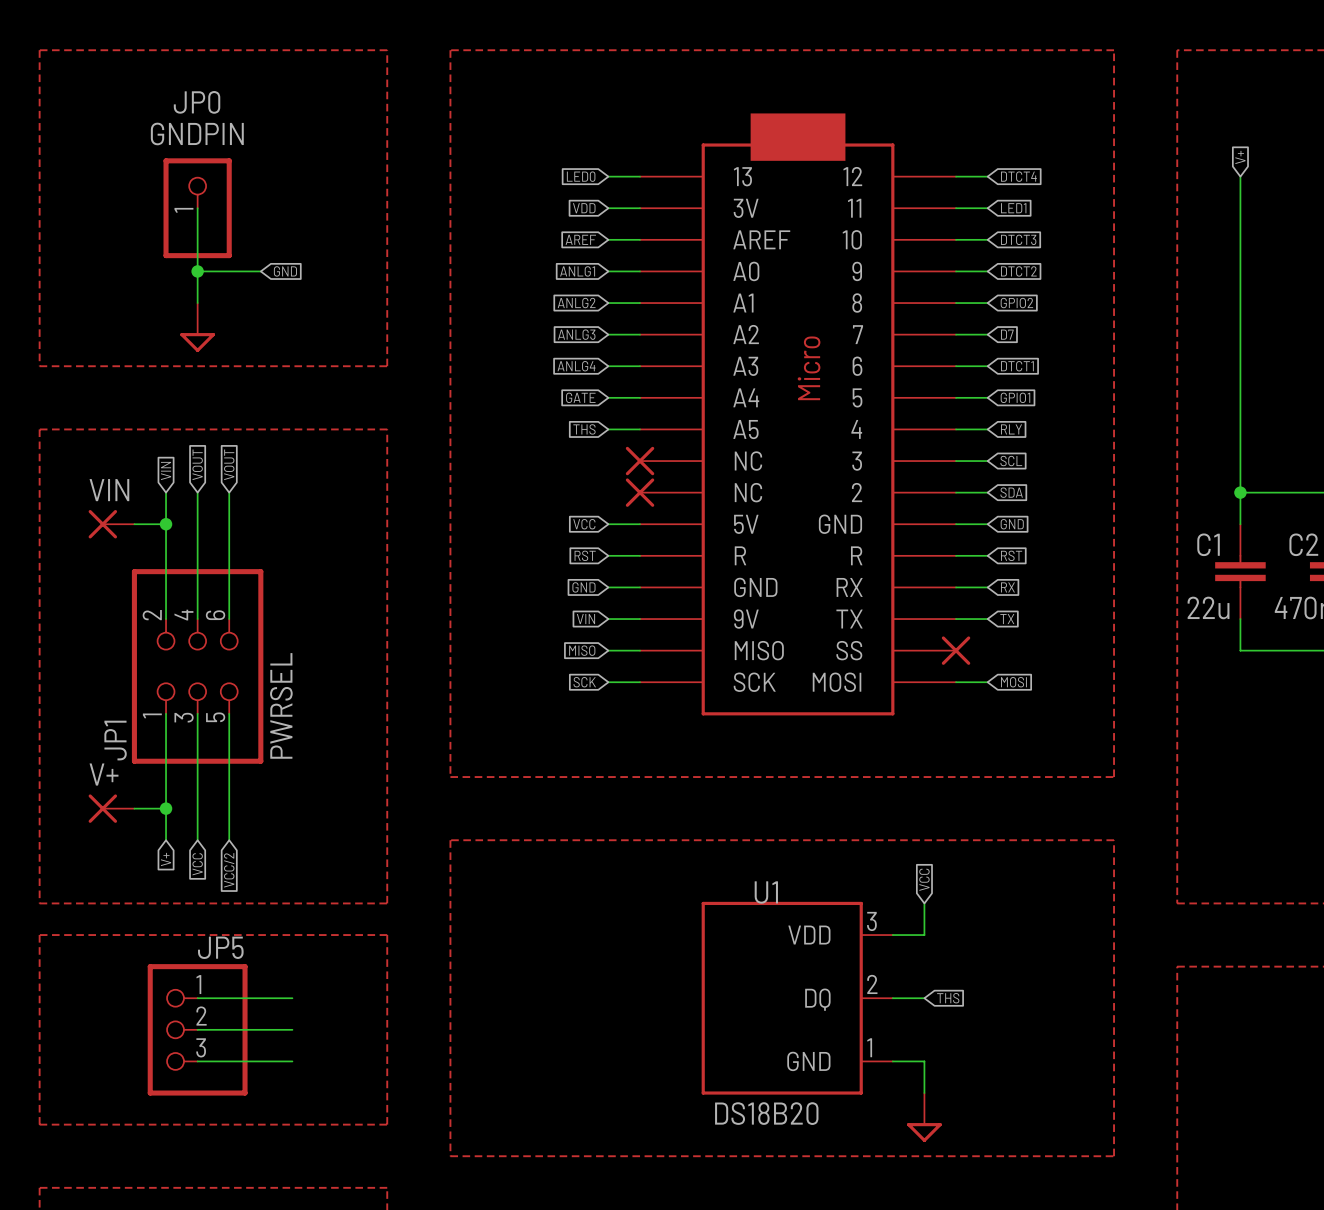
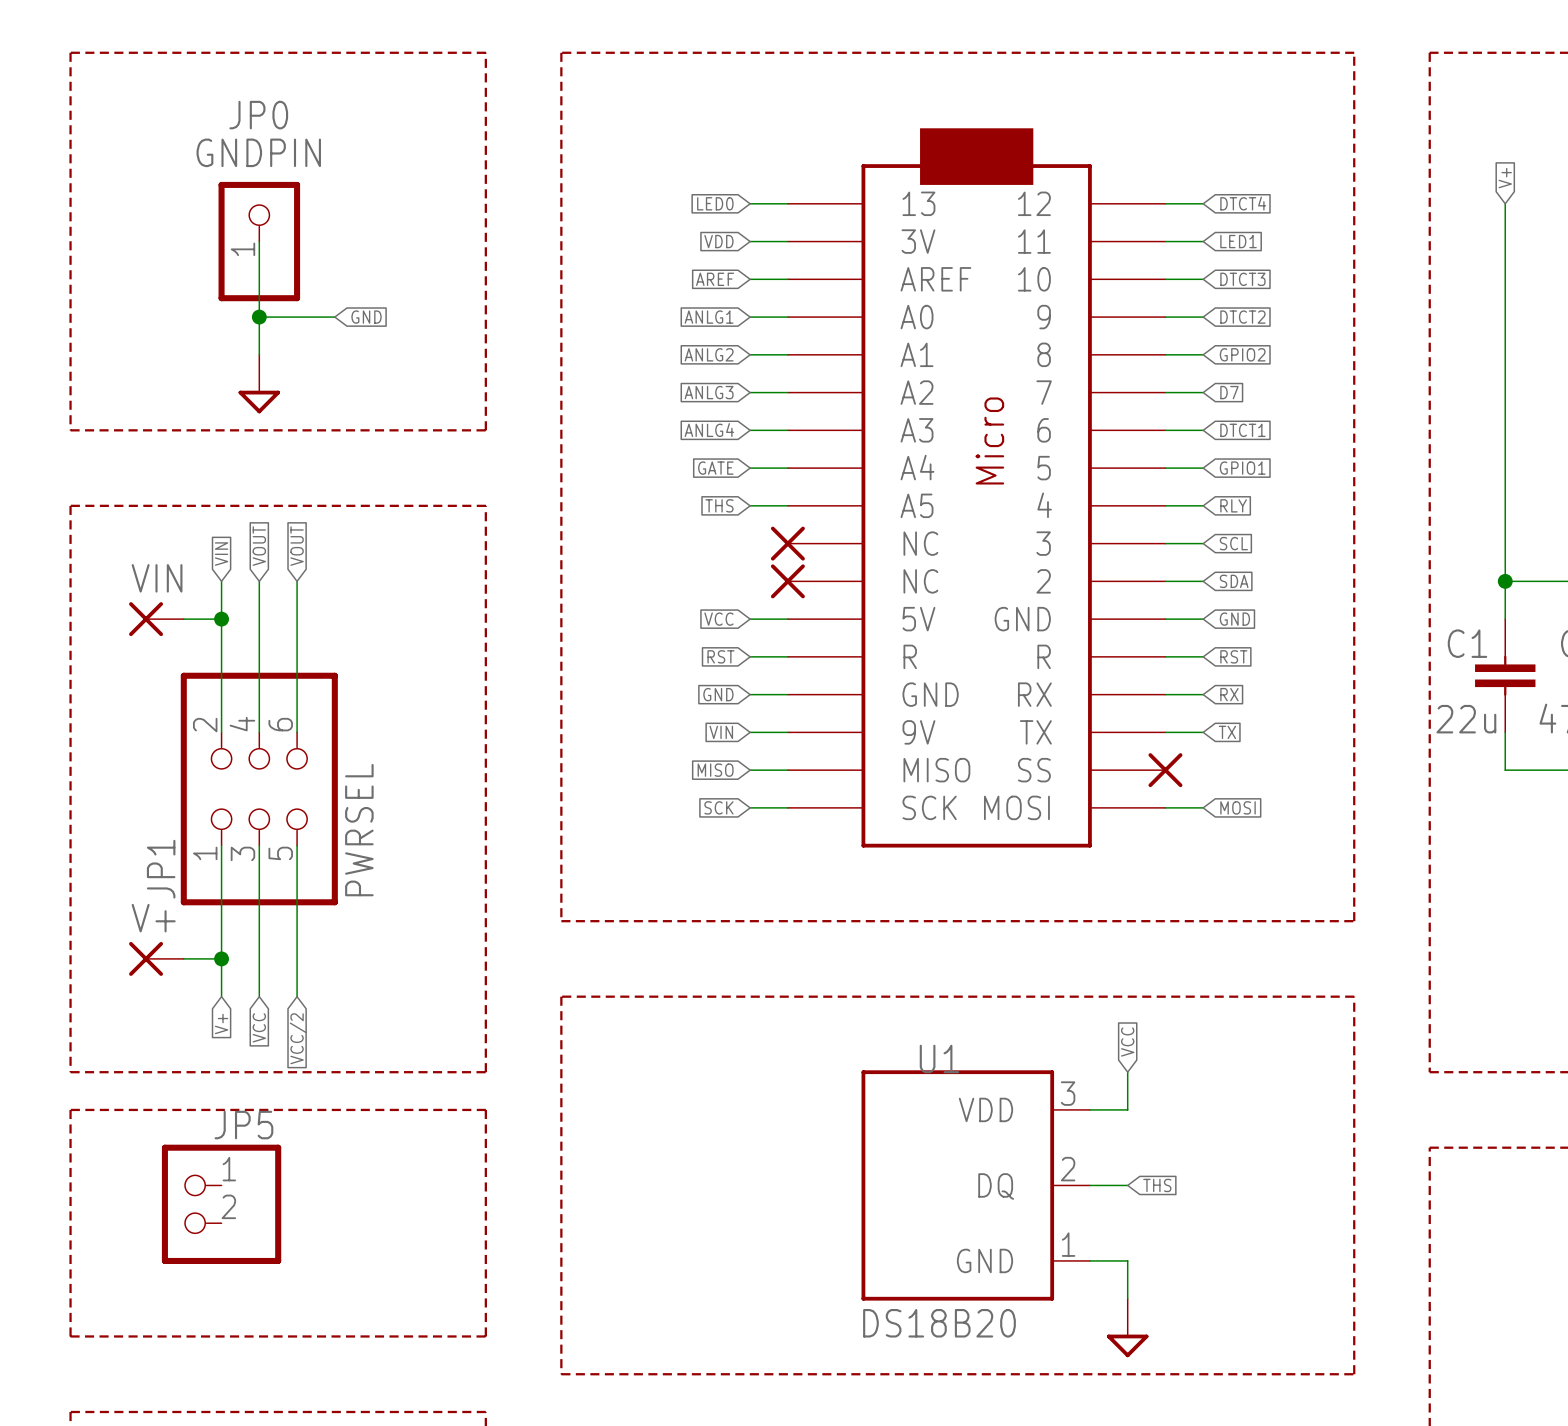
JP5 symbol: [147, 964, 248, 1096] -> [161, 1144, 282, 1264]
wire: (197, 998) (292, 998) -> none
wire: (197, 1029) (292, 1029) -> none
wire: (197, 1061) (292, 1061) -> none

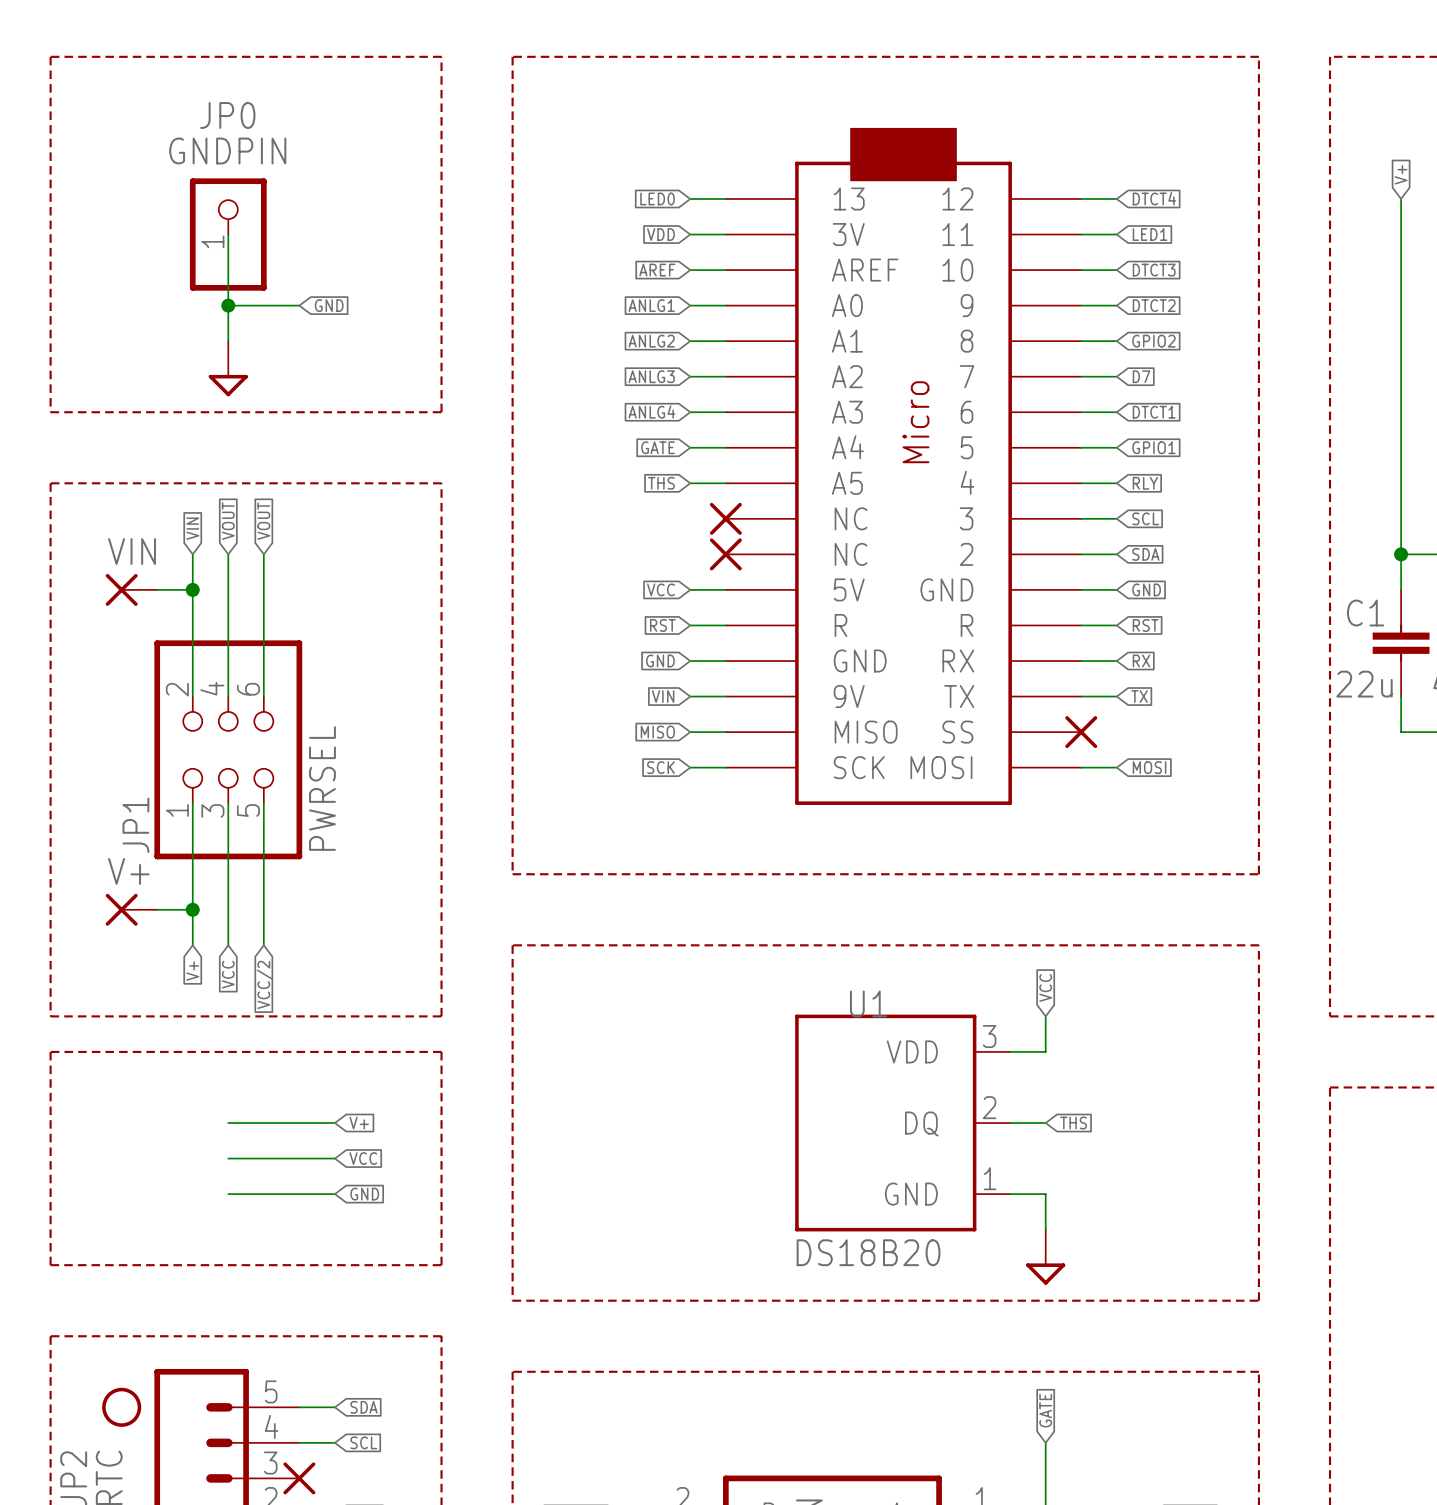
wire: none -> (228, 1123) (334, 1123)
global label: none -> V+ (359, 1123)
JP5: (221, 1204) -> none
wire: none -> (228, 1158) (334, 1158)
global label: none -> VCC (363, 1158)
wire: none -> (228, 1194) (334, 1194)
global label: none -> GND (364, 1194)

